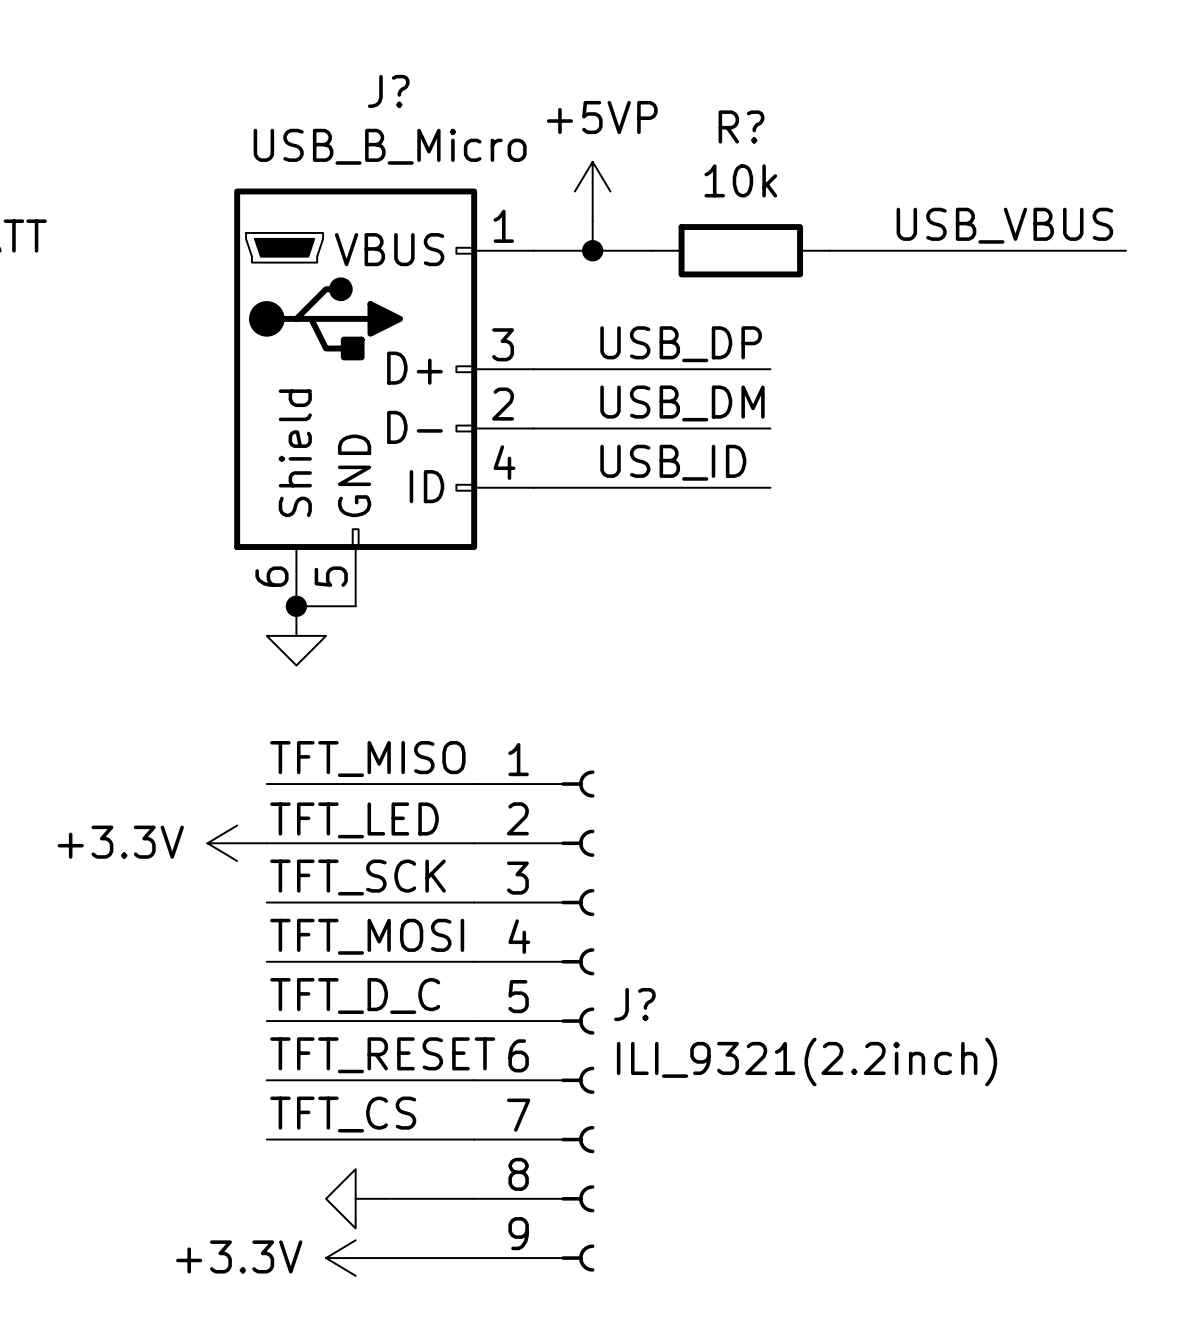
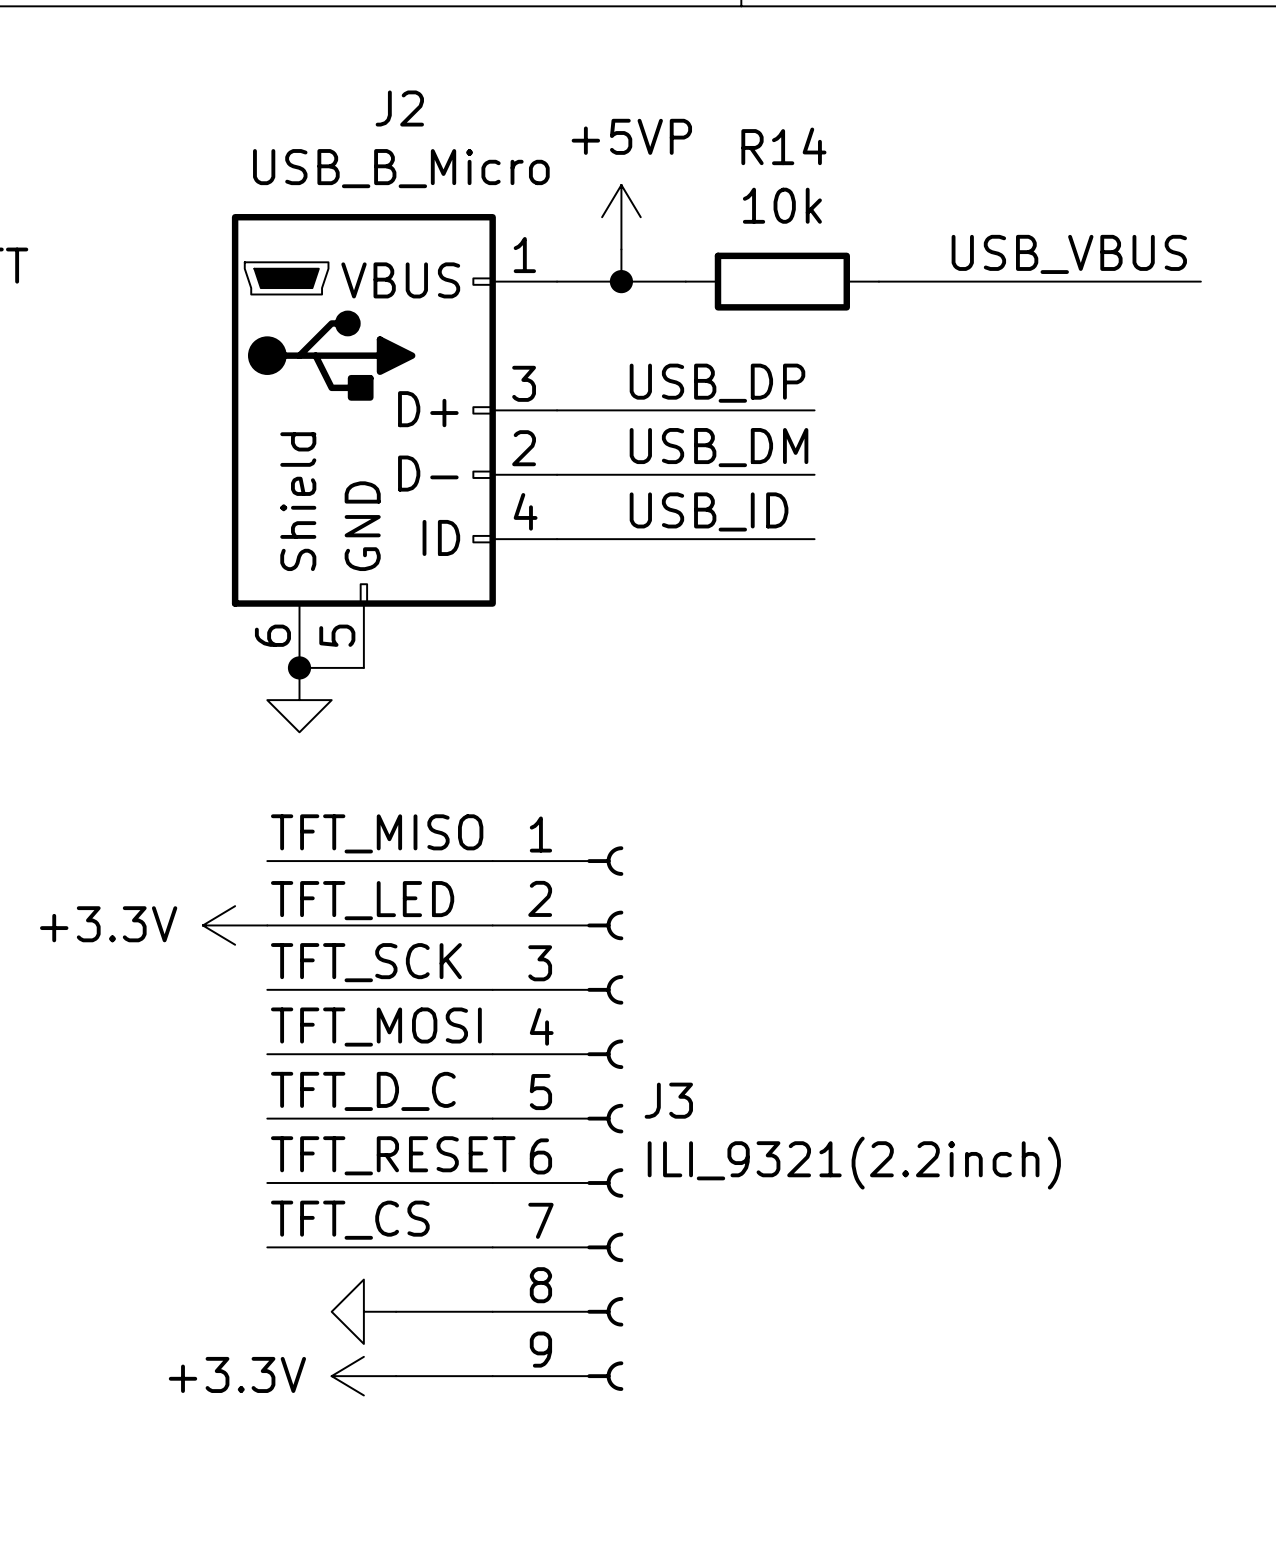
J? name: J? (388, 91) -> J2 (399, 108)
R? name: R? (741, 126) -> R14 (783, 146)
J? name: J? (634, 1004) -> J3 (668, 1100)

